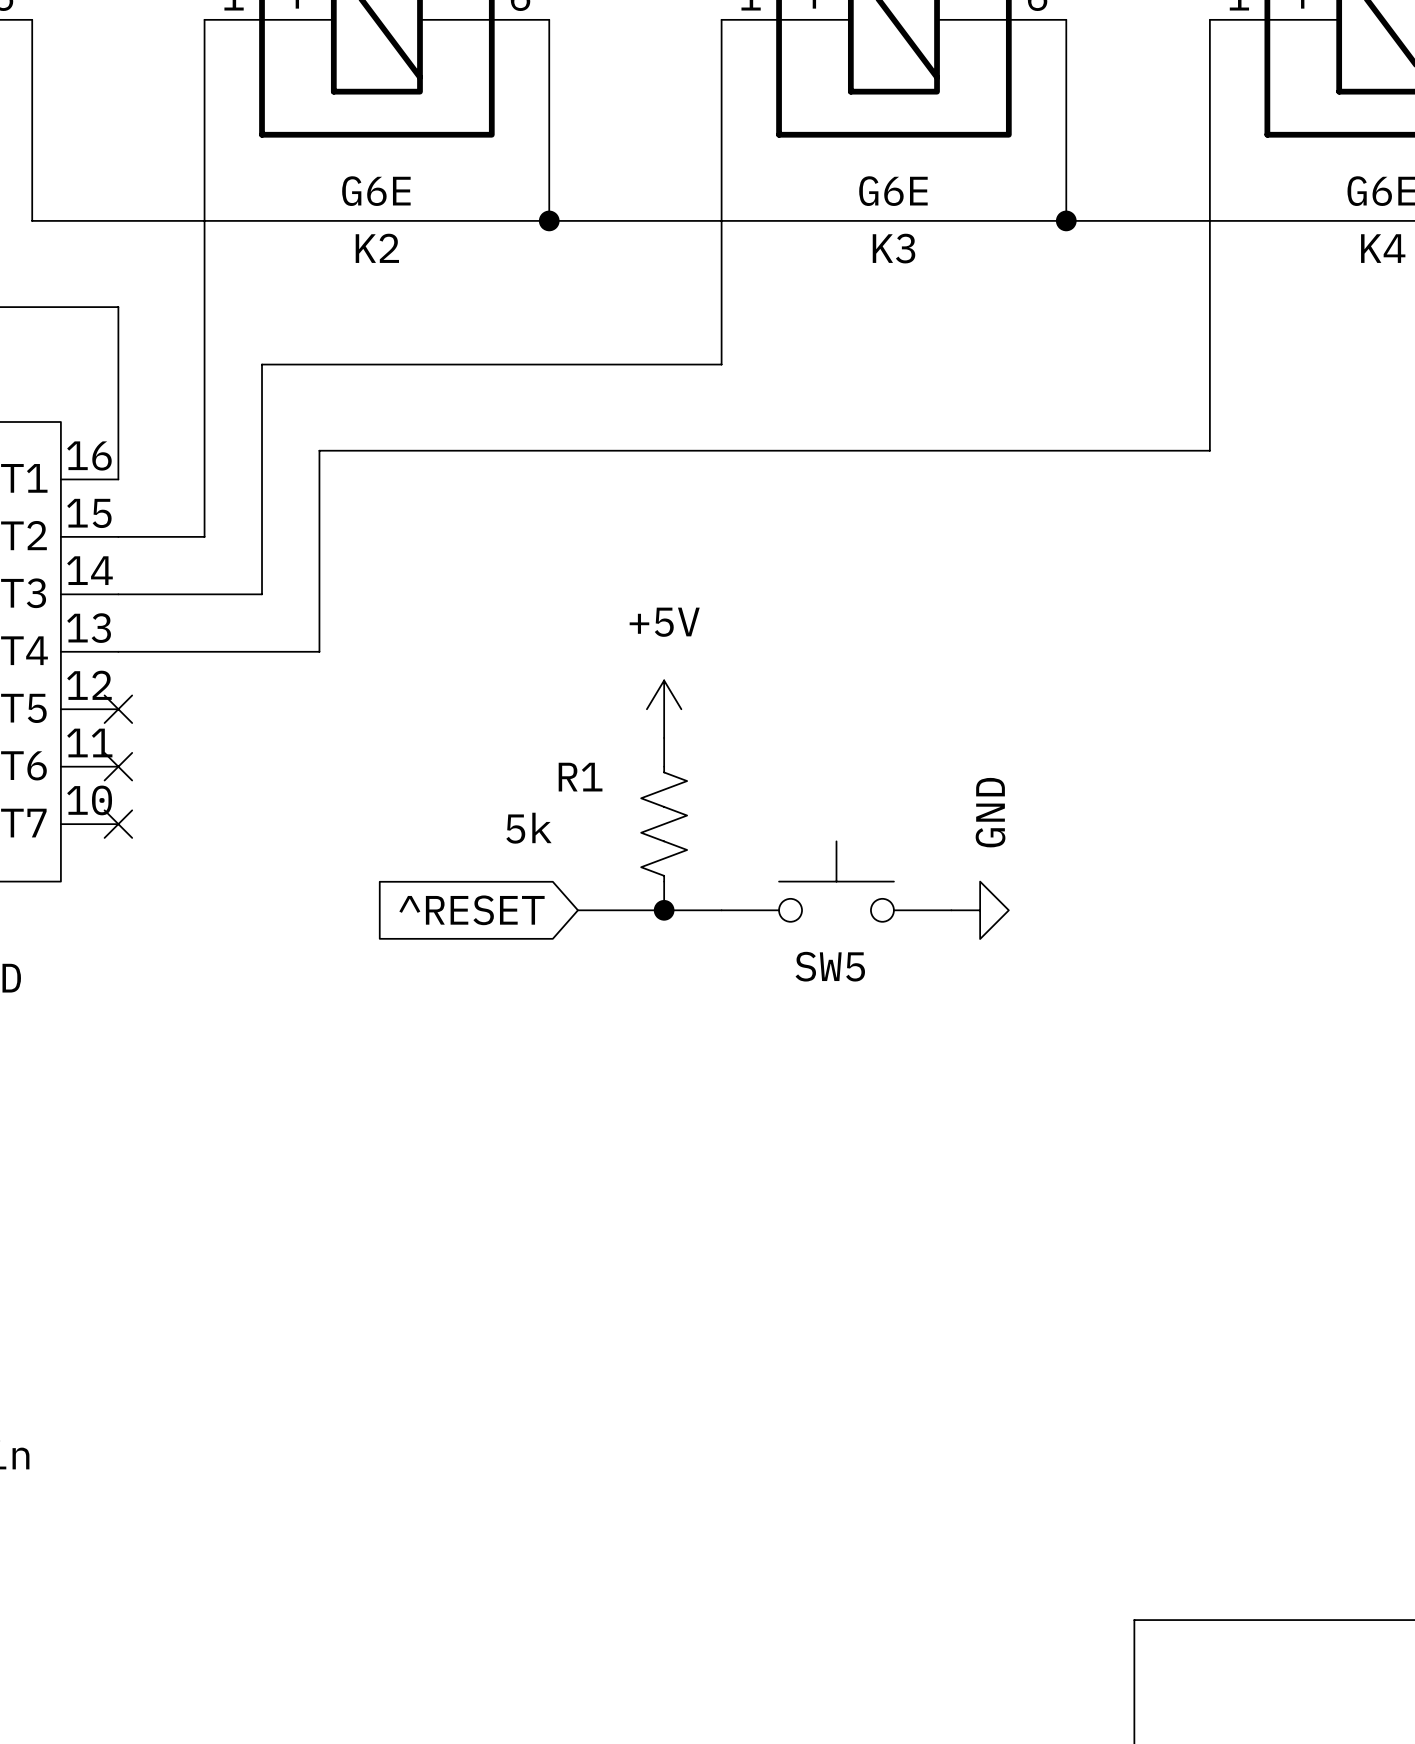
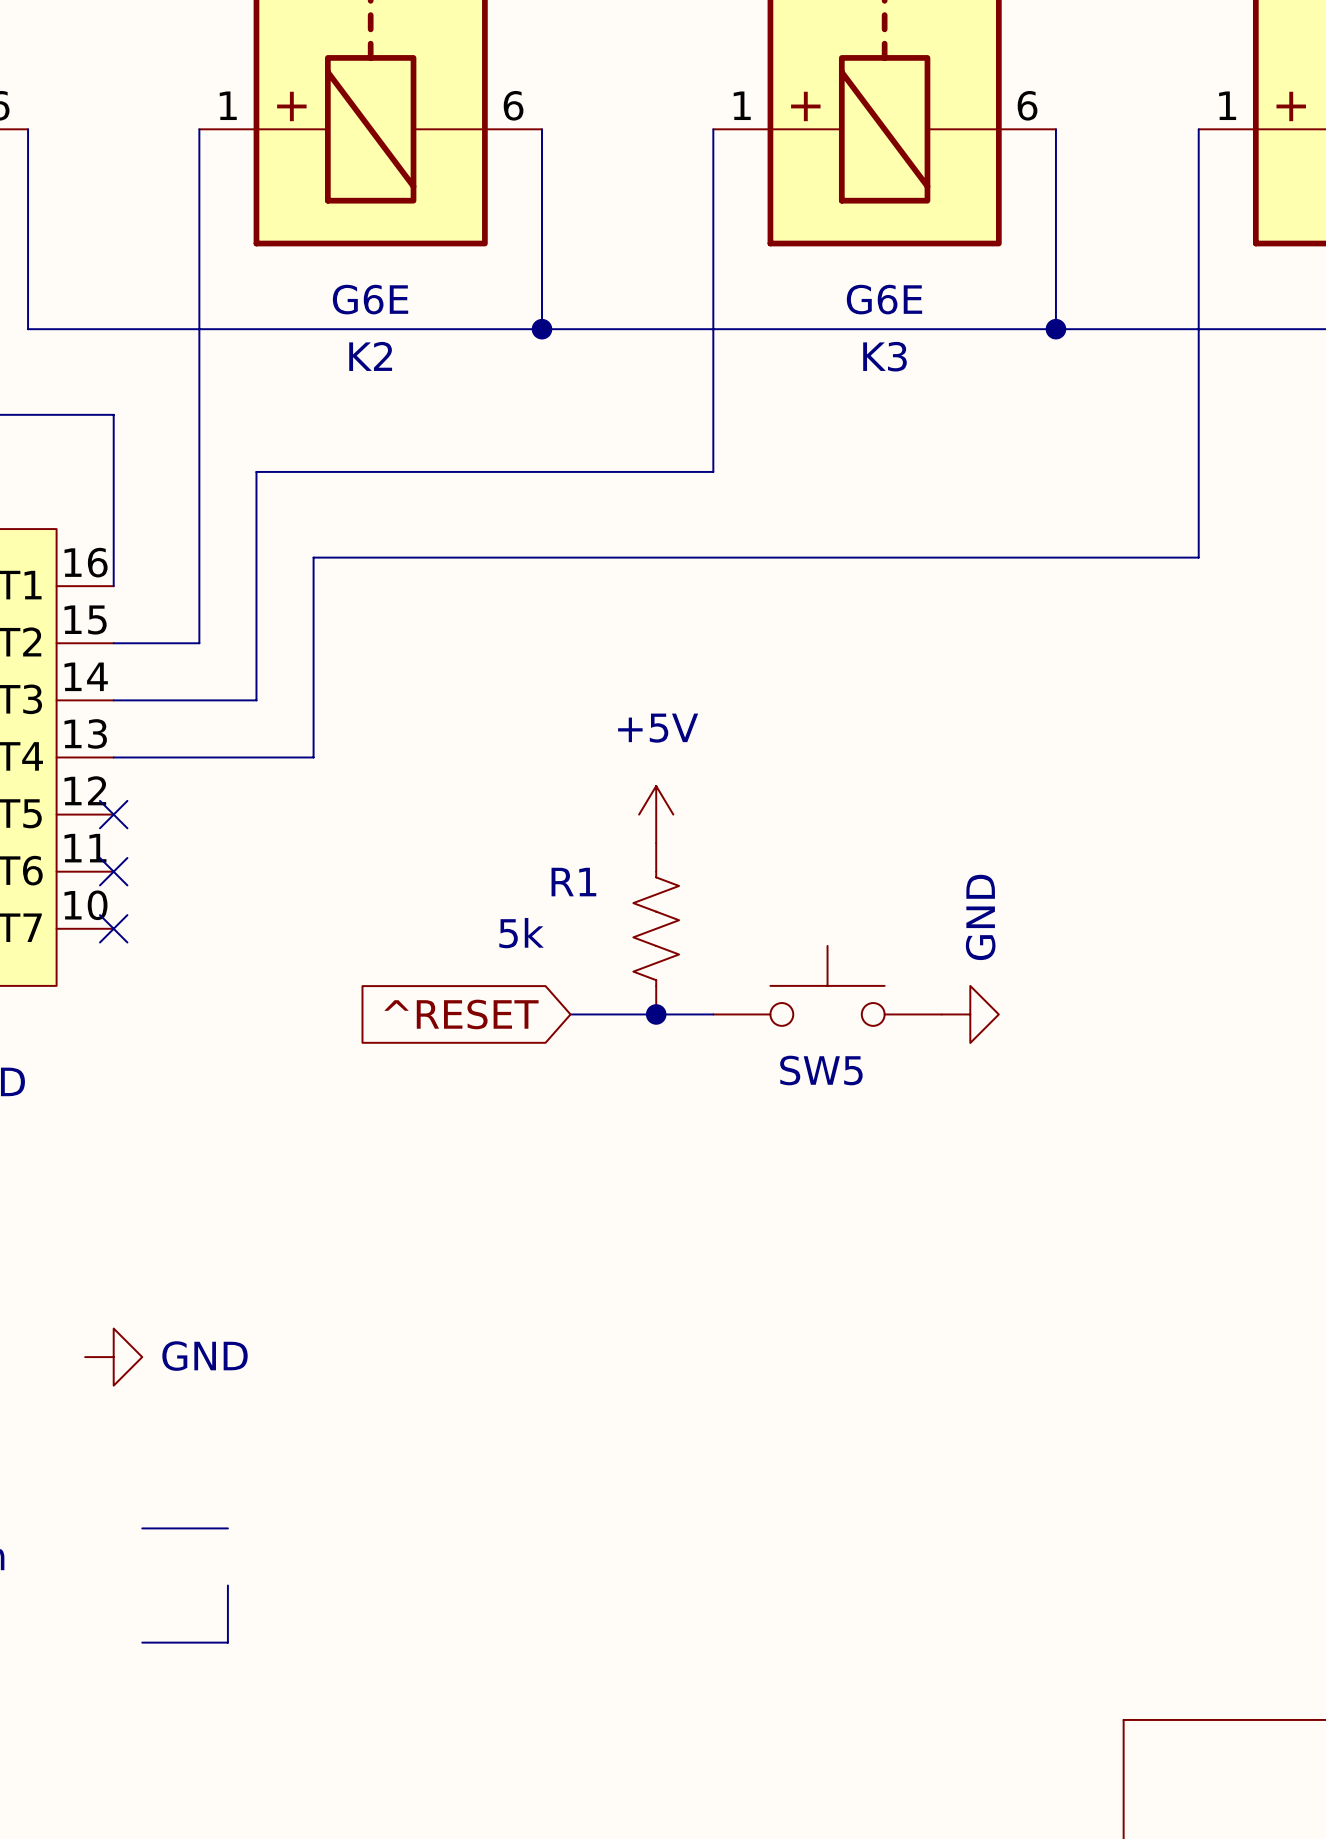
power symbol: none -> GND (113, 1357)
wire: none -> (142, 1528) (227, 1528)
wire: none -> (227, 1585) (227, 1642) (142, 1642)

